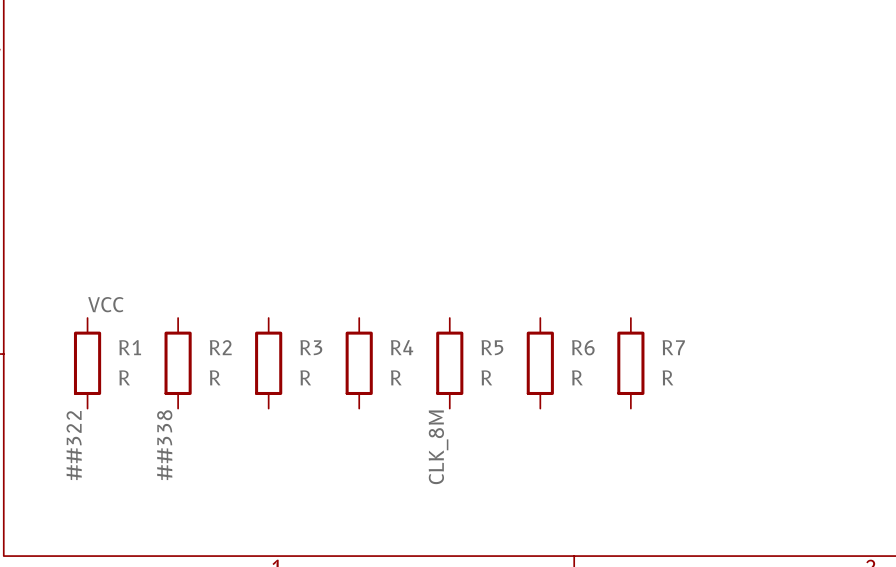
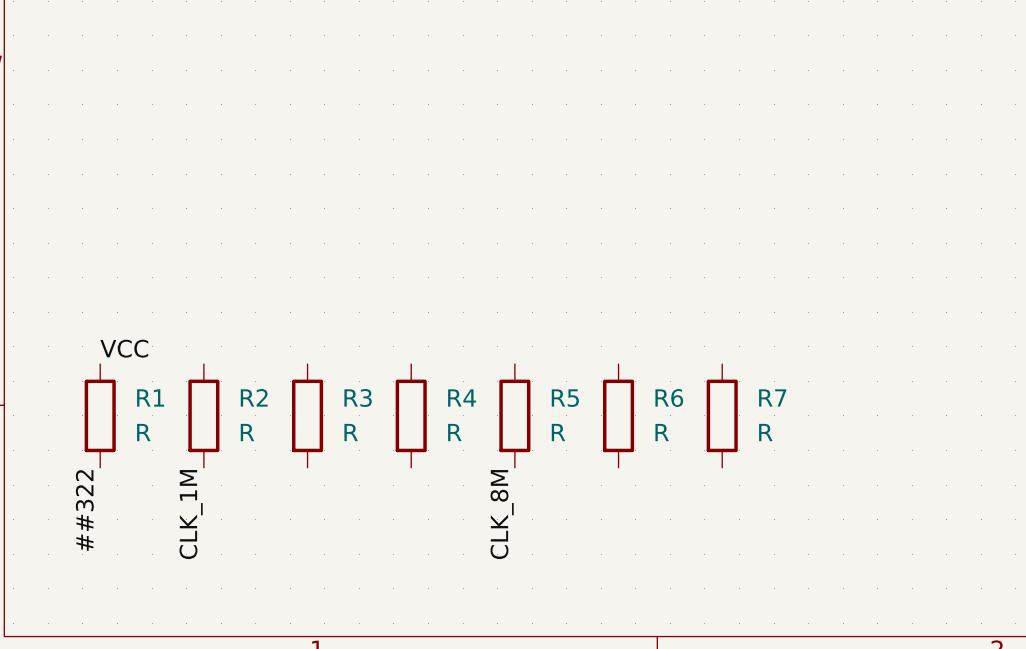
label: ##338 (164, 445) -> CLK_1M (191, 514)

